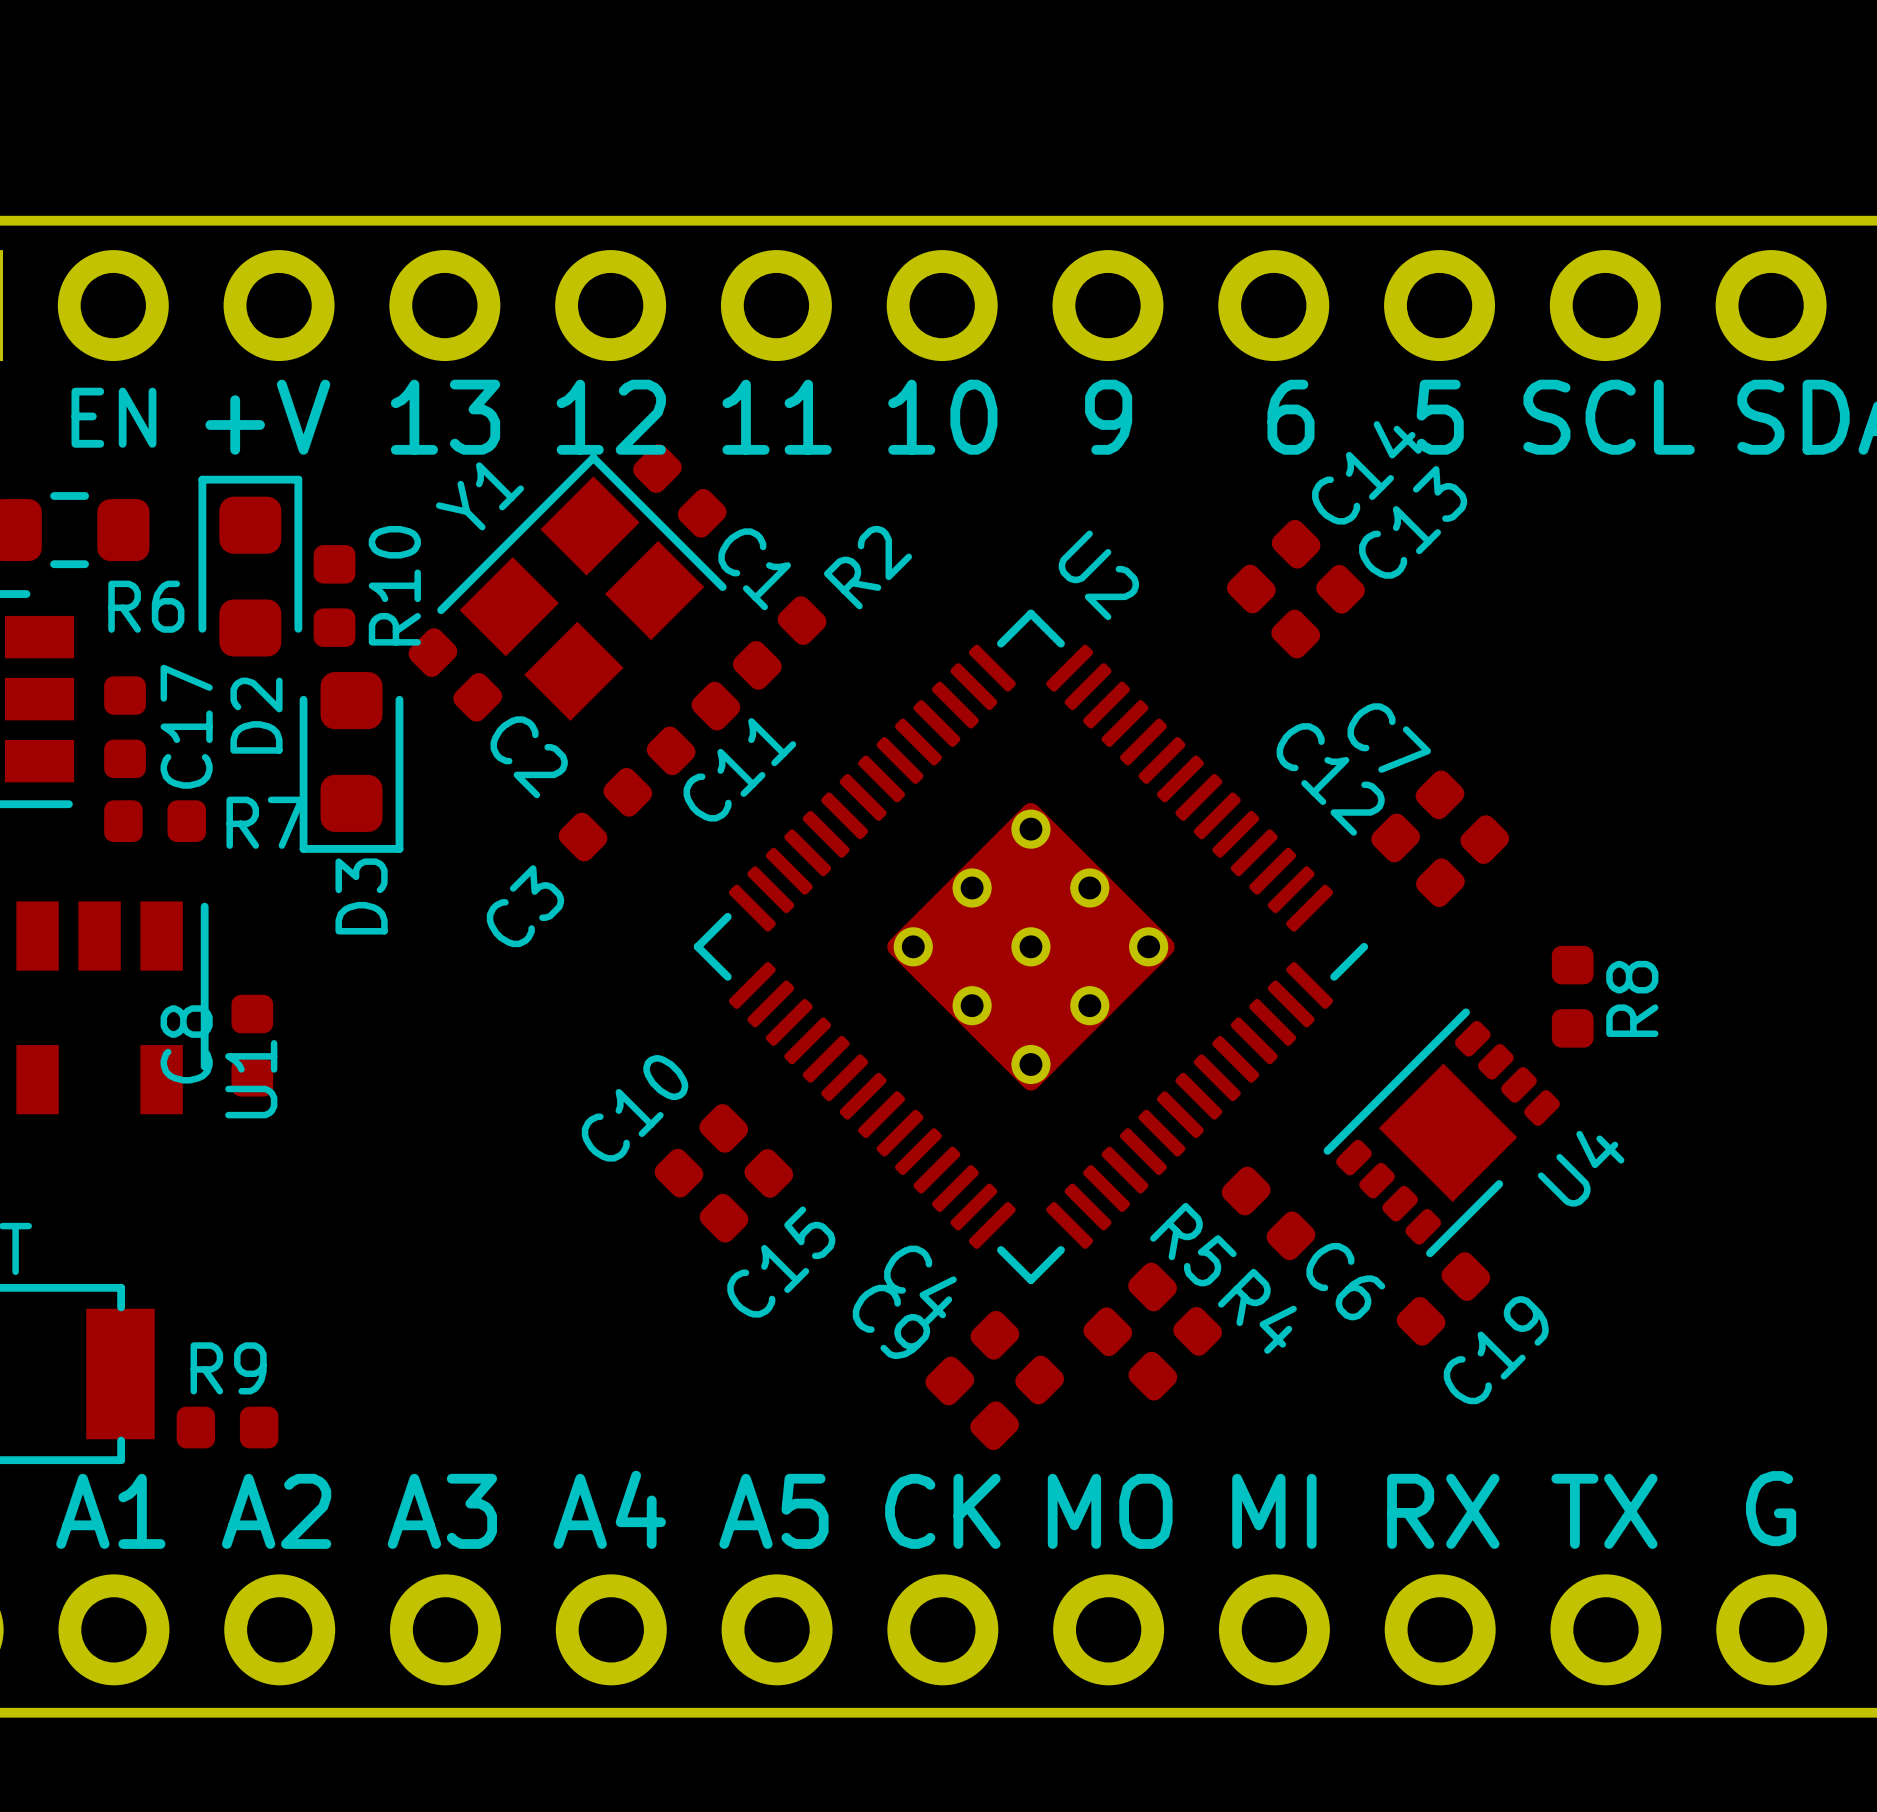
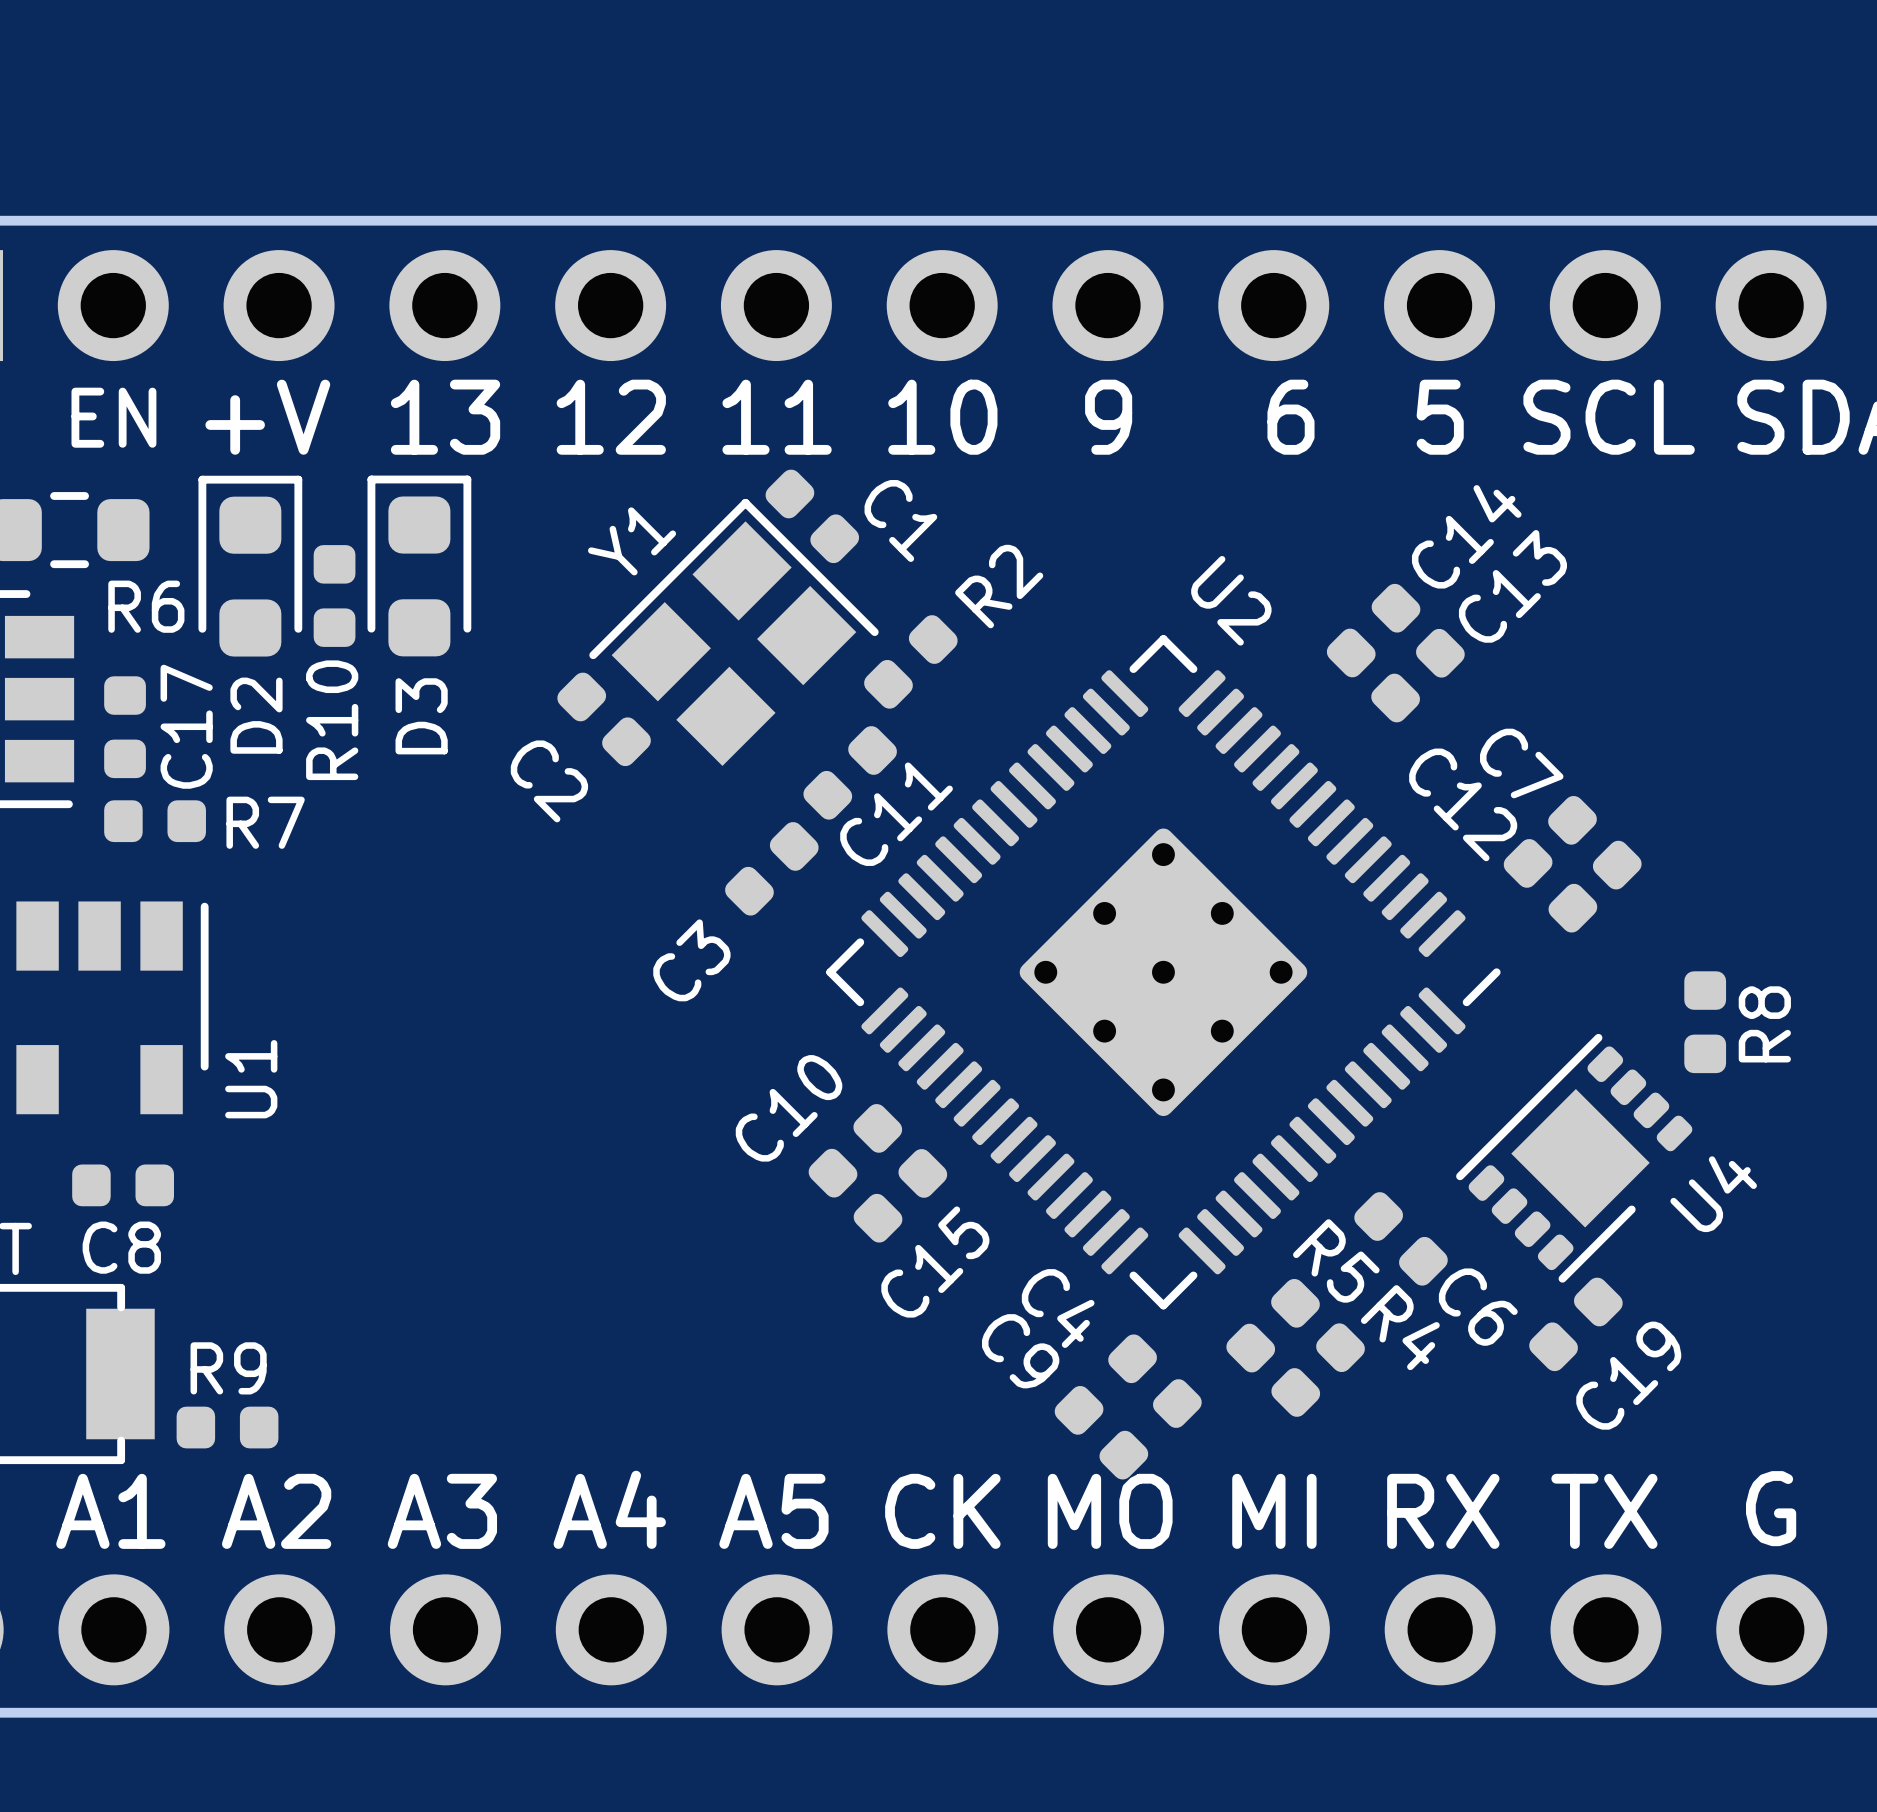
C1 position: (679, 490) -> (812, 516)
C14 position: (1273, 566) -> (1373, 630)
C1 name position: C1 (754, 569) -> C1 (900, 520)
R10 name position: R10 (394, 585) -> R10 (332, 720)
Y1 position: (581, 587) -> (733, 632)
C13 position: (1318, 611) -> (1418, 675)
R2 position: (779, 643) -> (910, 661)
C2 position: (455, 674) -> (604, 719)
C11 position: (693, 728) -> (850, 772)
C2 name position: C2 (529, 757) -> C2 (549, 781)
D3 rotation: 0° (351, 762) -> 180° (419, 565)
D3 position: (351, 762) -> (419, 565)
C3 position: (605, 814) -> (771, 868)
C7 position: (1462, 817) -> (1594, 842)
C12 position: (1418, 860) -> (1550, 885)
U2 position: (1030, 946) -> (1163, 972)
R8 position: (1572, 996) -> (1705, 1022)
C8 rotation: 0° (252, 1045) -> 90° clockwise (123, 1185)
C8 position: (252, 1045) -> (123, 1185)
U4 position: (1441, 1132) -> (1574, 1158)
C10 position: (701, 1150) -> (855, 1150)
C15 position: (746, 1195) -> (900, 1195)
C6 position: (1268, 1213) -> (1401, 1238)
C19 position: (1443, 1298) -> (1575, 1324)
R5 position: (1130, 1309) -> (1273, 1325)
R4 position: (1175, 1353) -> (1318, 1370)
C4 position: (1017, 1357) -> (1154, 1381)
C9 position: (972, 1403) -> (1101, 1432)

